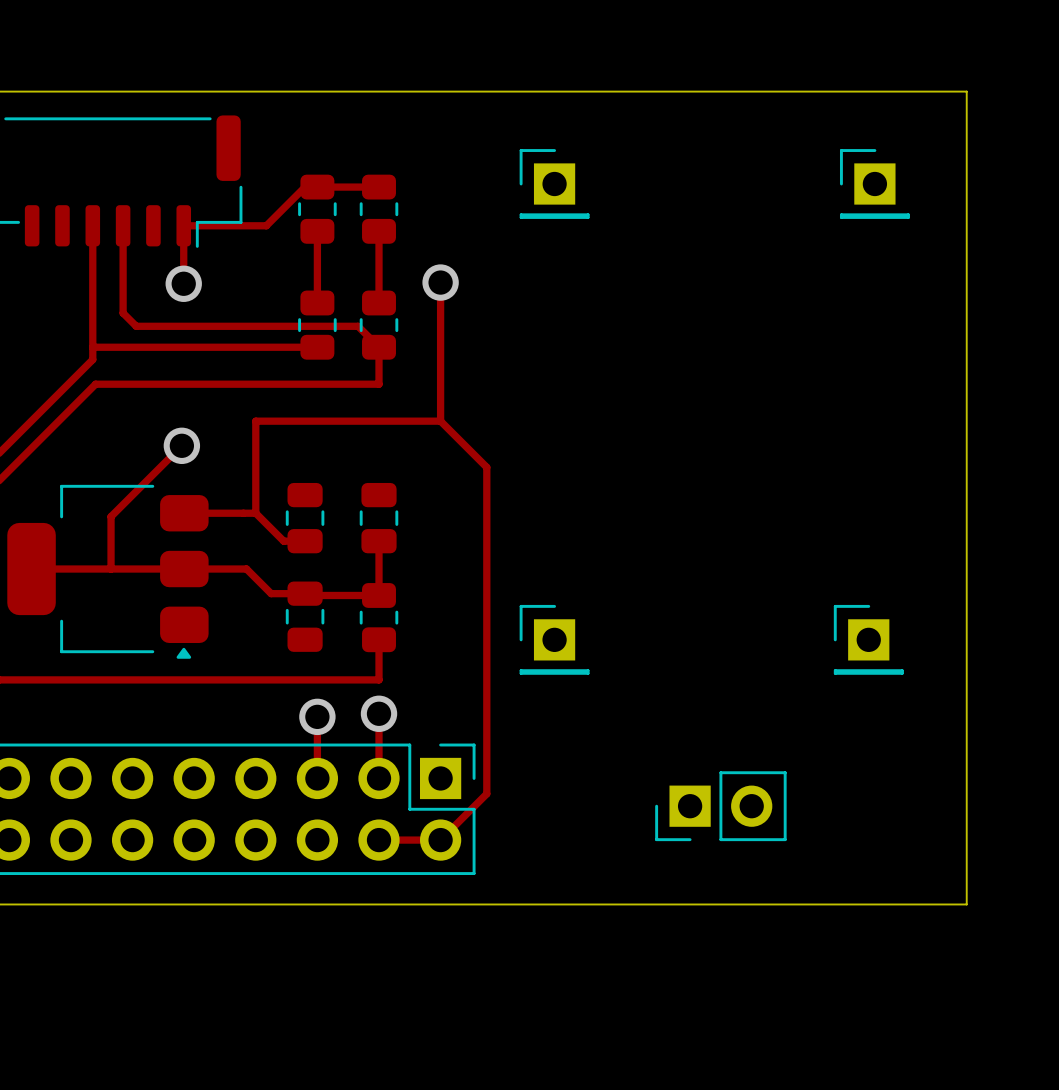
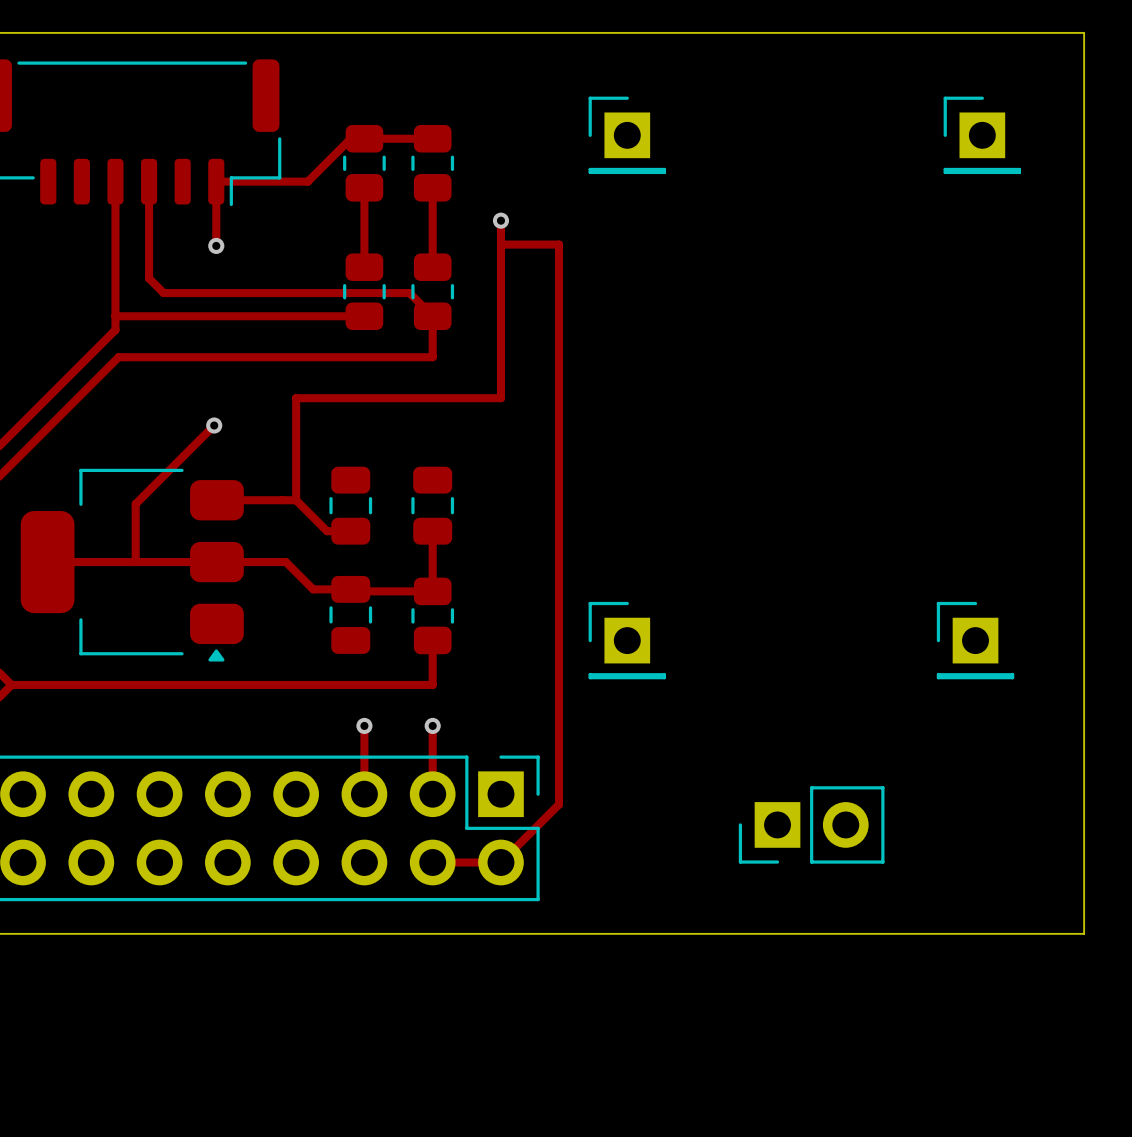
via size: [422, 264, 459, 301] -> [492, 212, 510, 229]
via size: [165, 265, 202, 302] -> [208, 237, 225, 254]
track: (440, 421) (486, 467) (486, 793) -> (500, 220) (500, 244) (559, 244) (559, 804) (552, 811)
via size: [163, 427, 201, 465] -> [206, 417, 223, 434]
via size: [360, 695, 398, 732] -> [424, 717, 441, 735]
via size: [299, 698, 336, 736] -> [356, 717, 373, 735]

